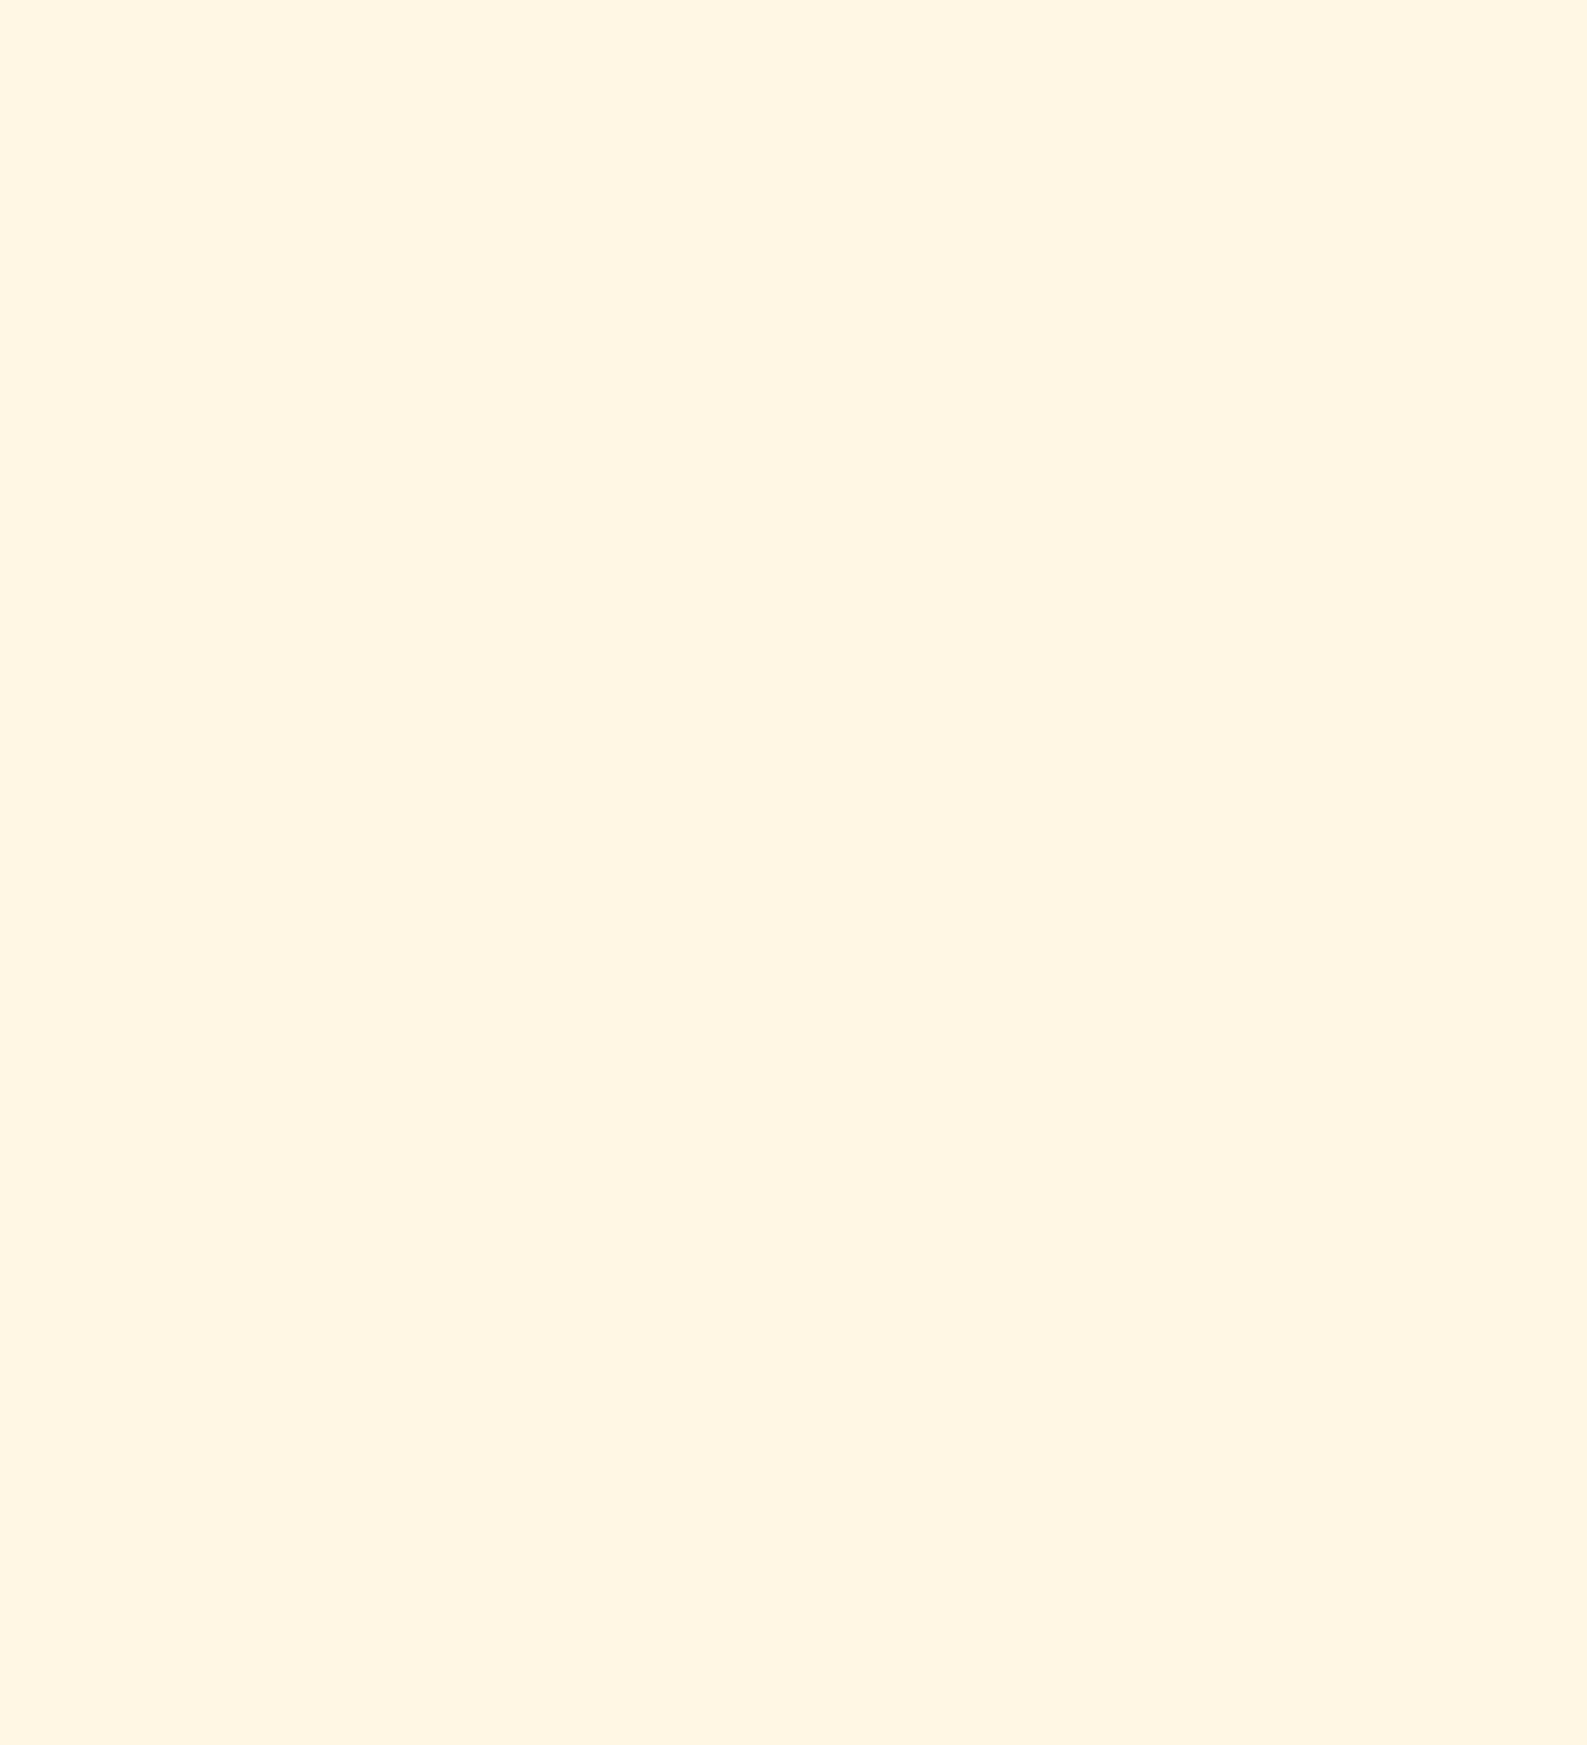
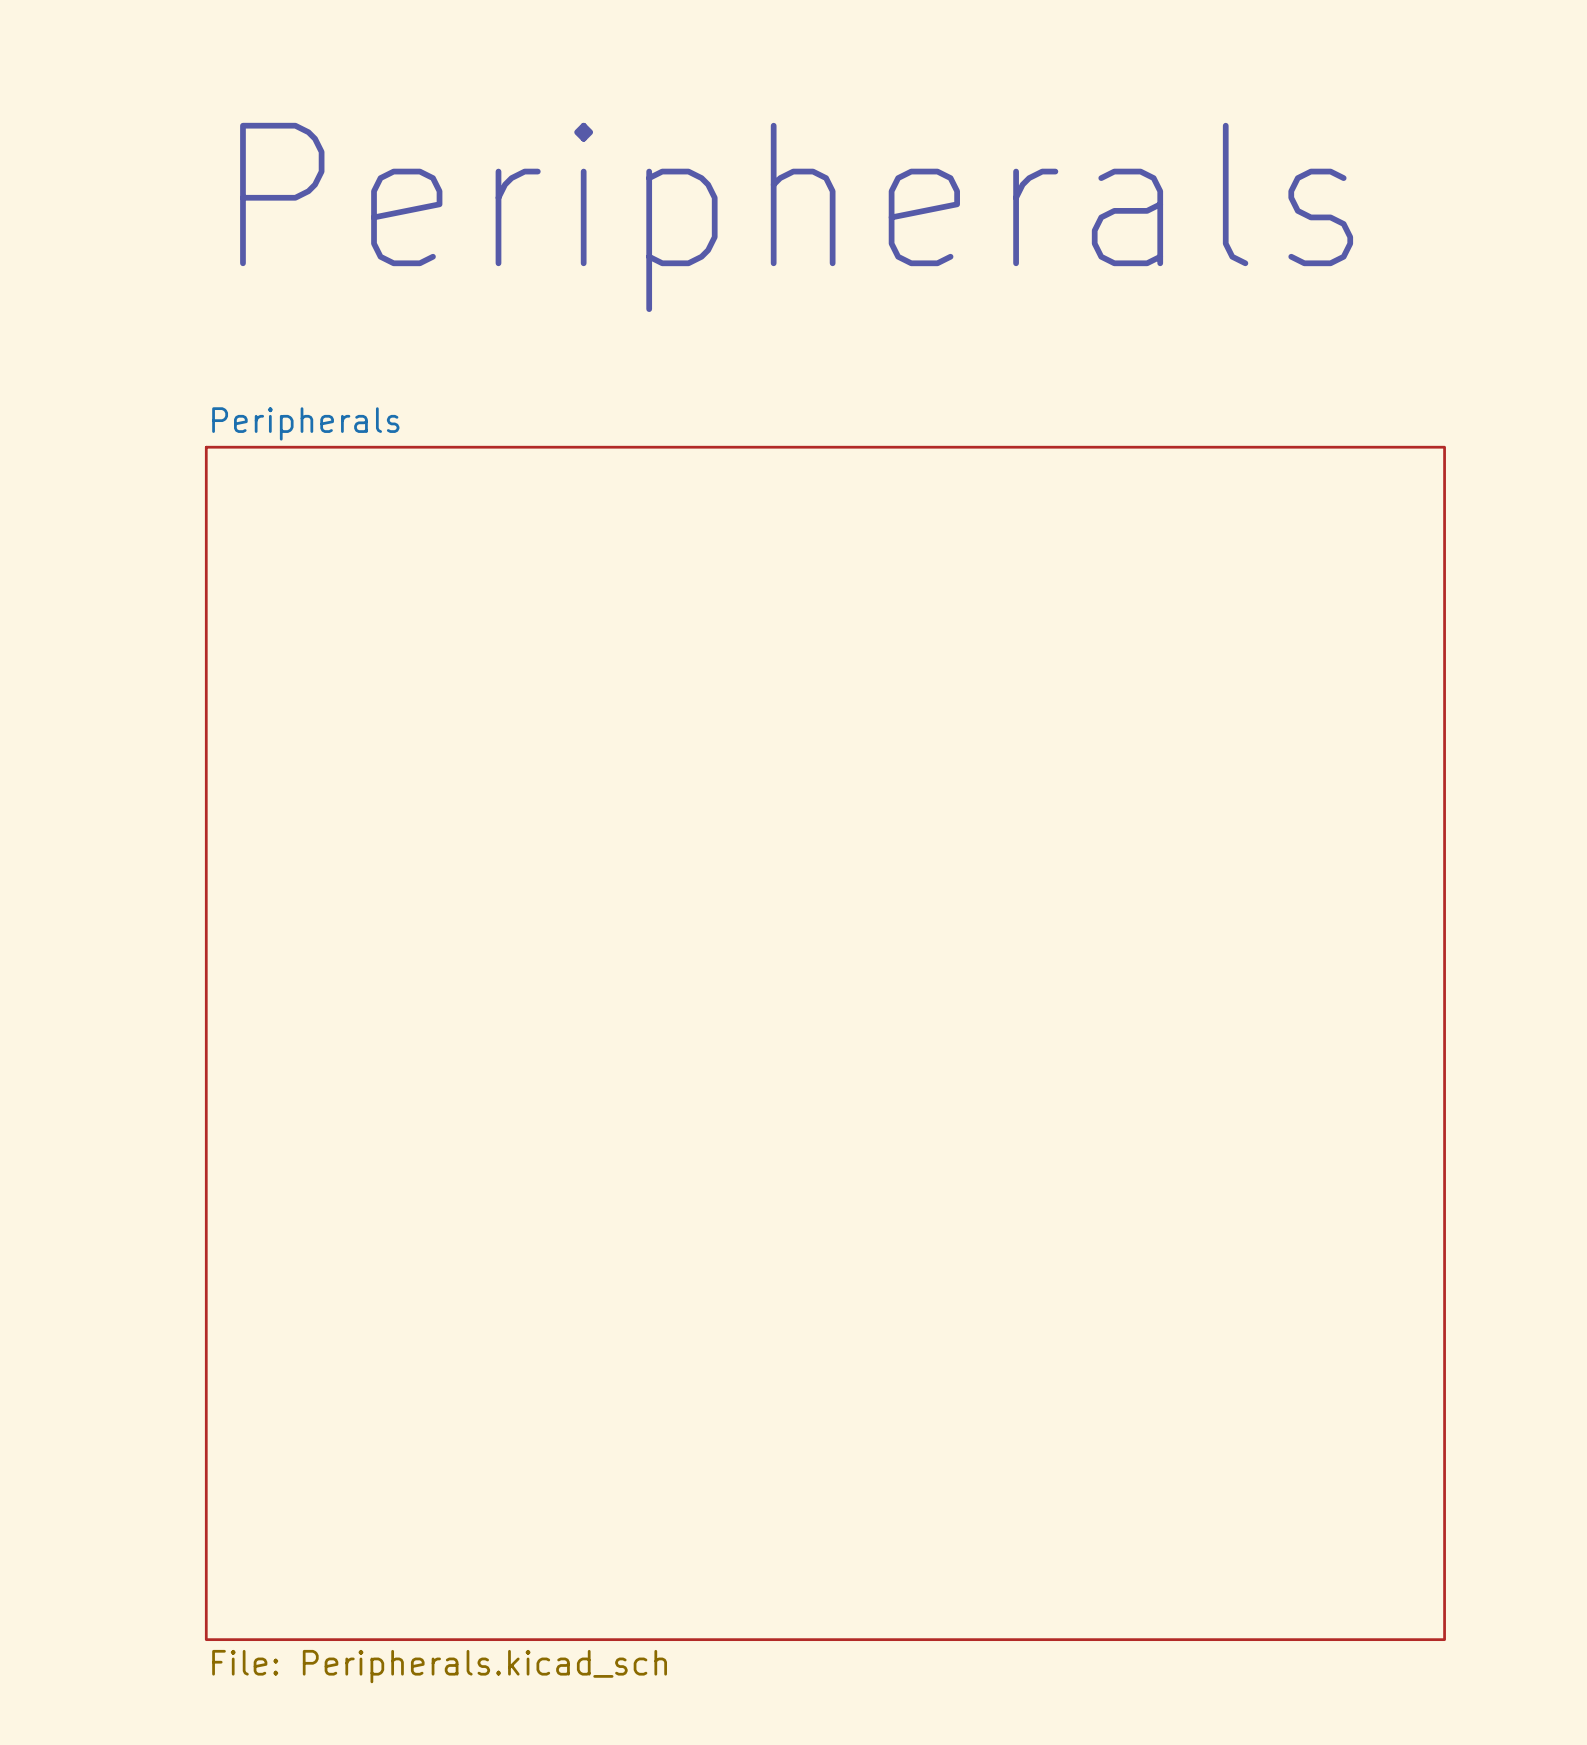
text: none -> Peripherals (796, 217)
sheet Peripherals: none -> File: Peripherals.kicad_sch (825, 1043)

